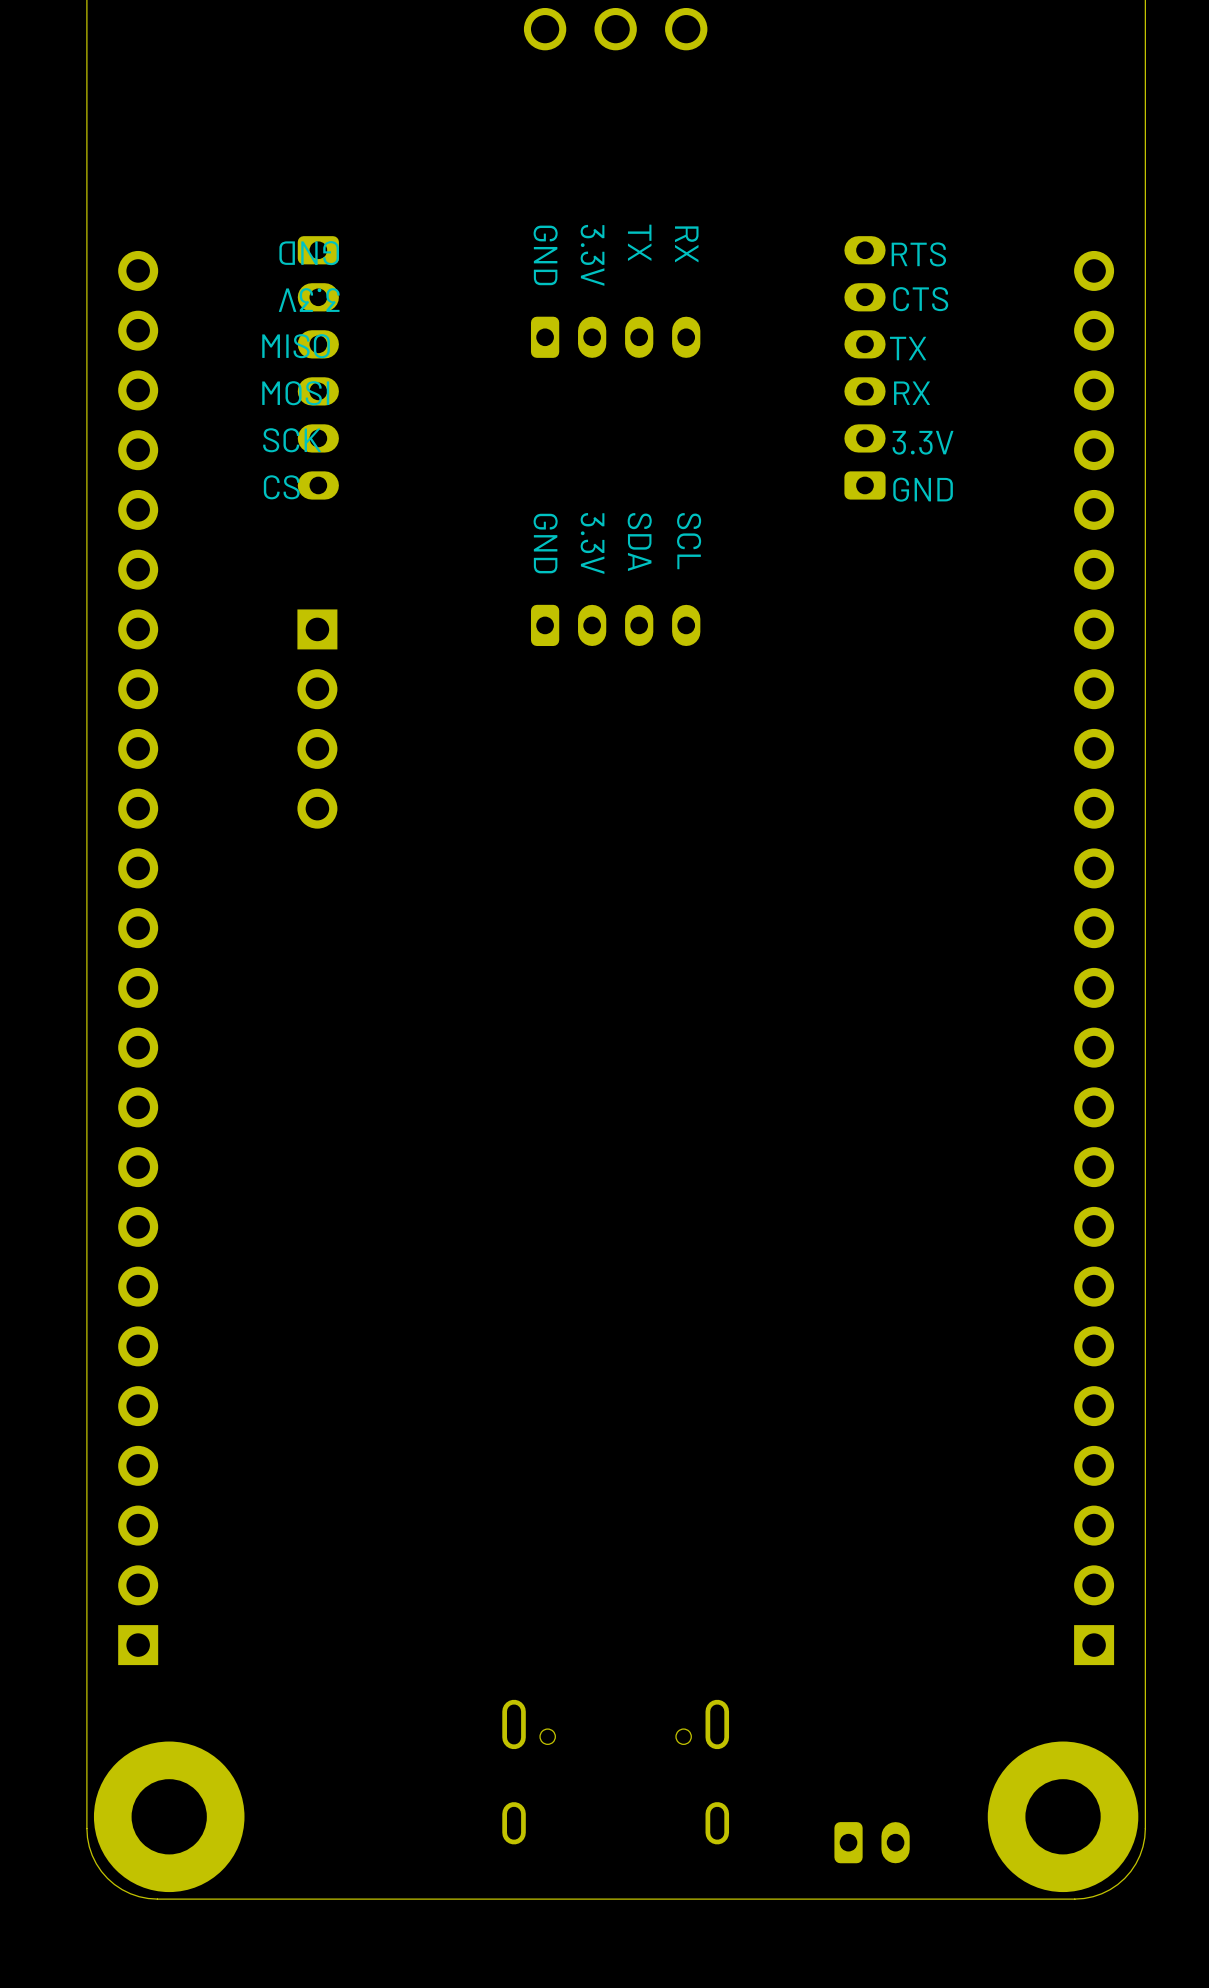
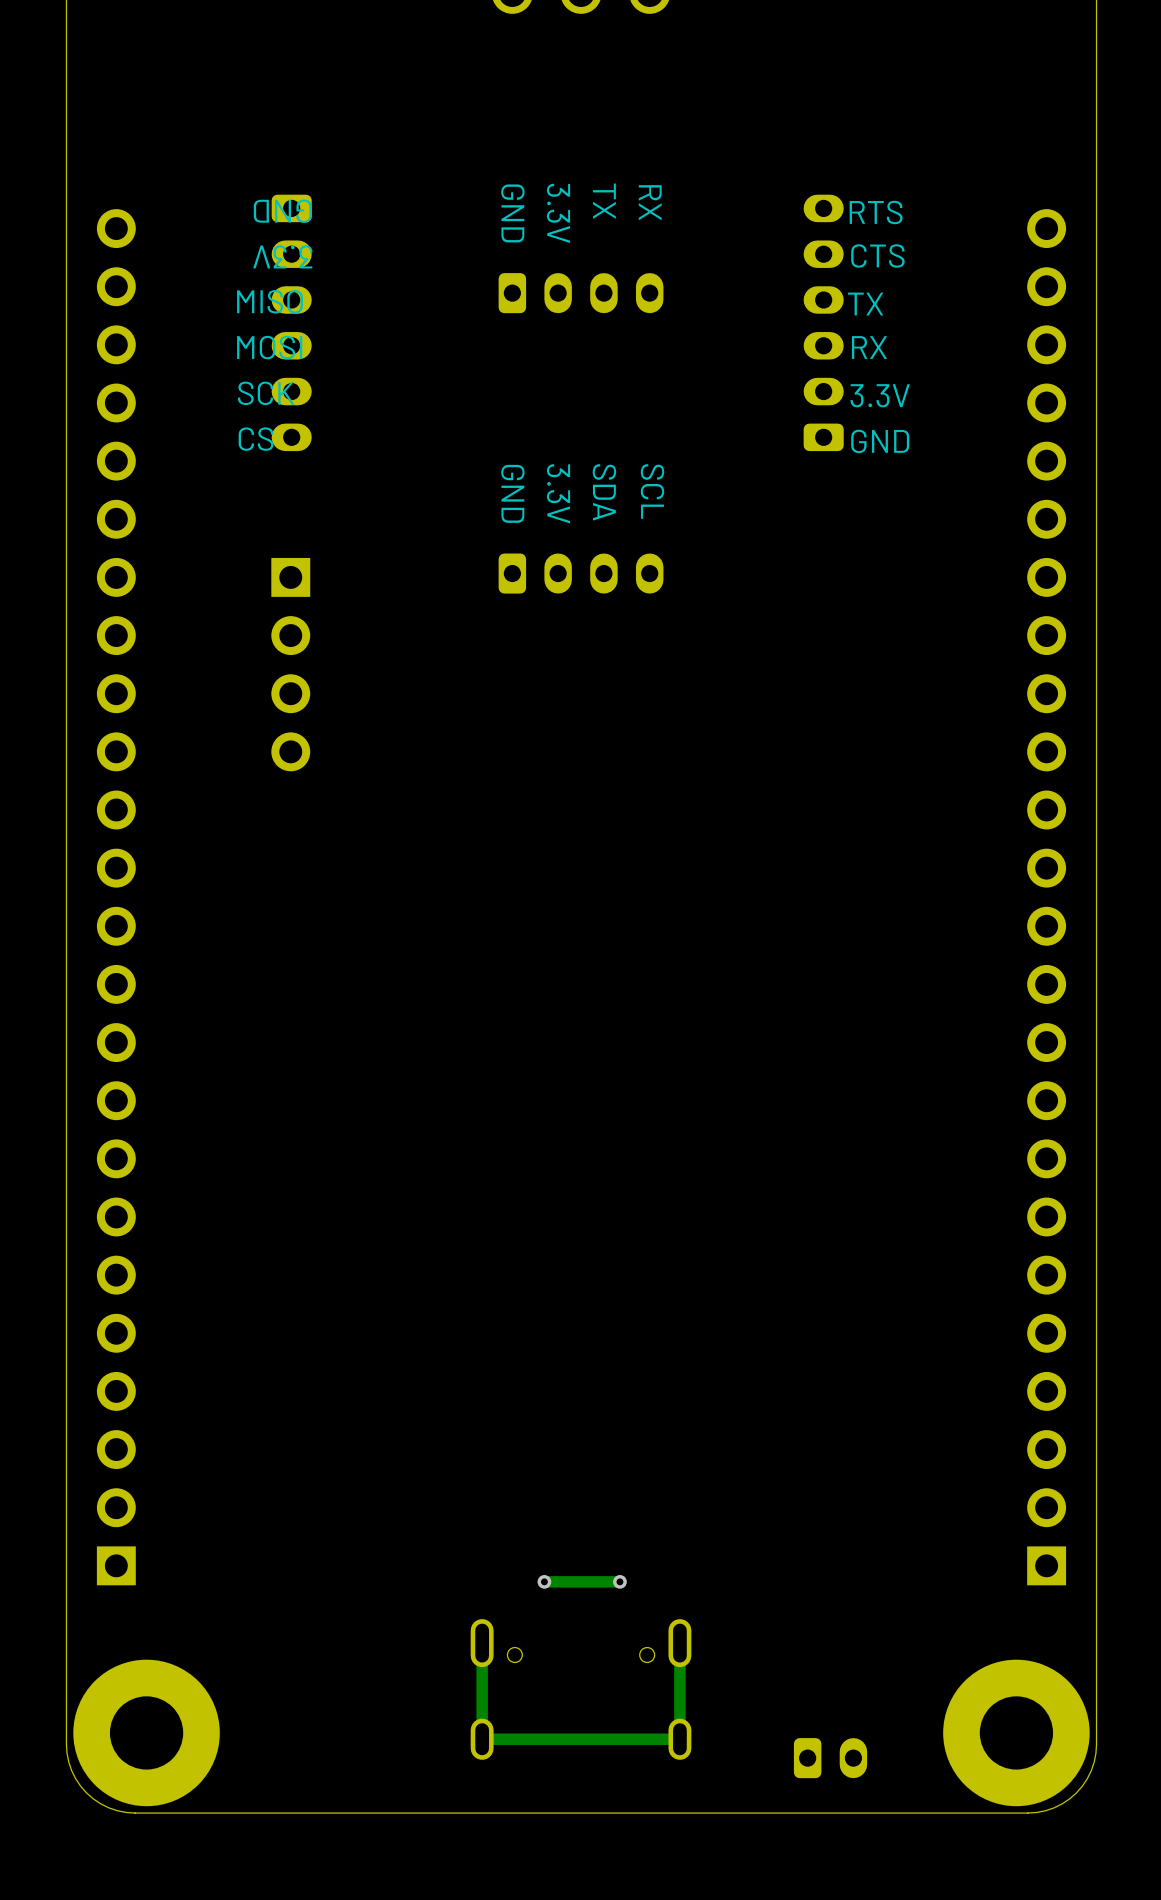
via: none -> (544, 1581)
track: none -> (619, 1581) (544, 1581)
via: none -> (619, 1581)
track: none -> (679, 1643) (679, 1739) (482, 1739) (482, 1643)

